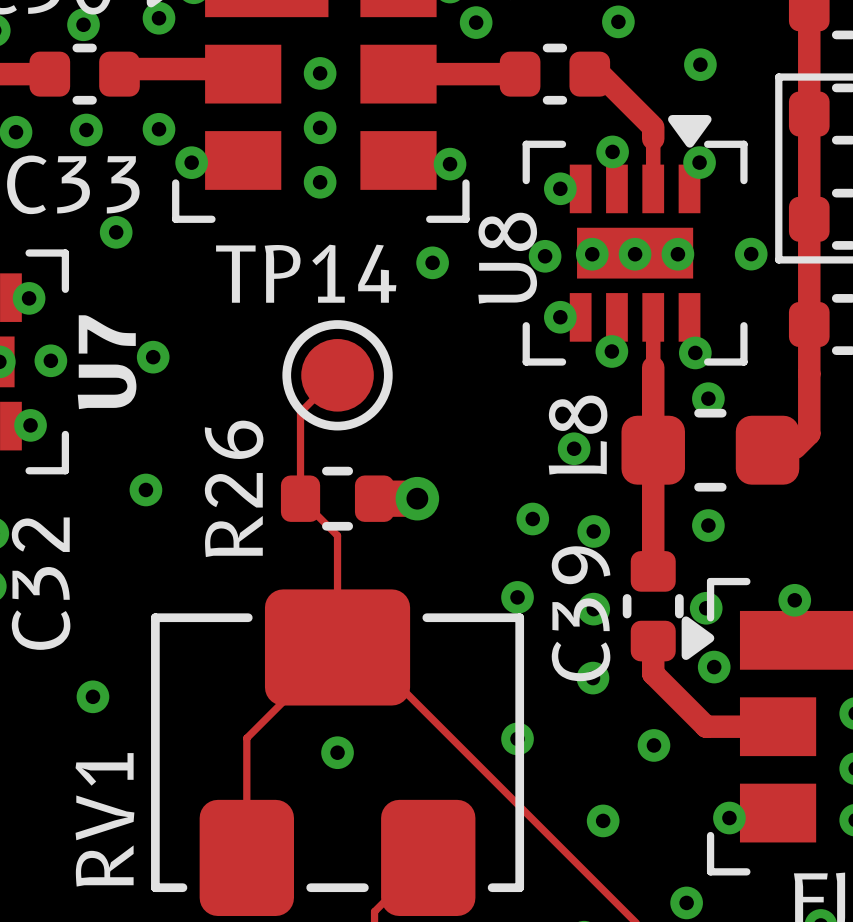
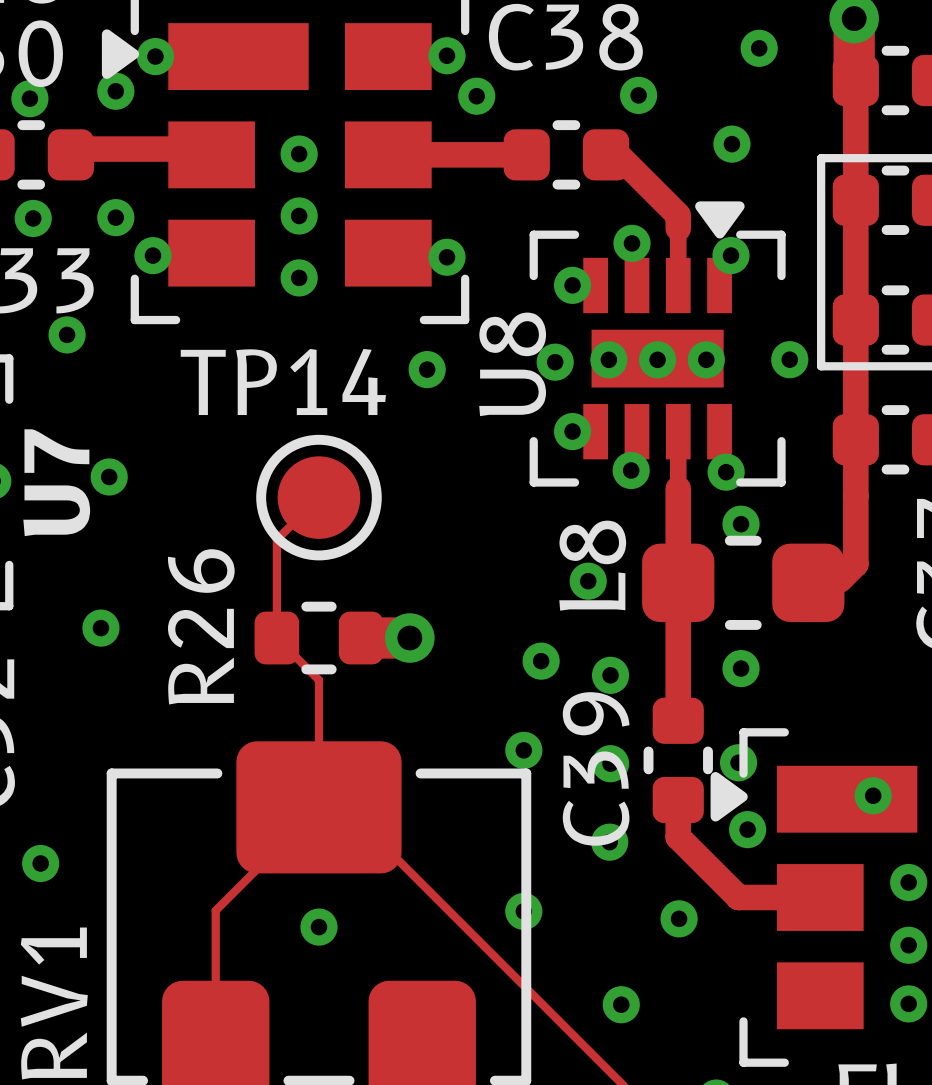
via position: (794, 600) -> (873, 795)
via: (729, 818) -> none

